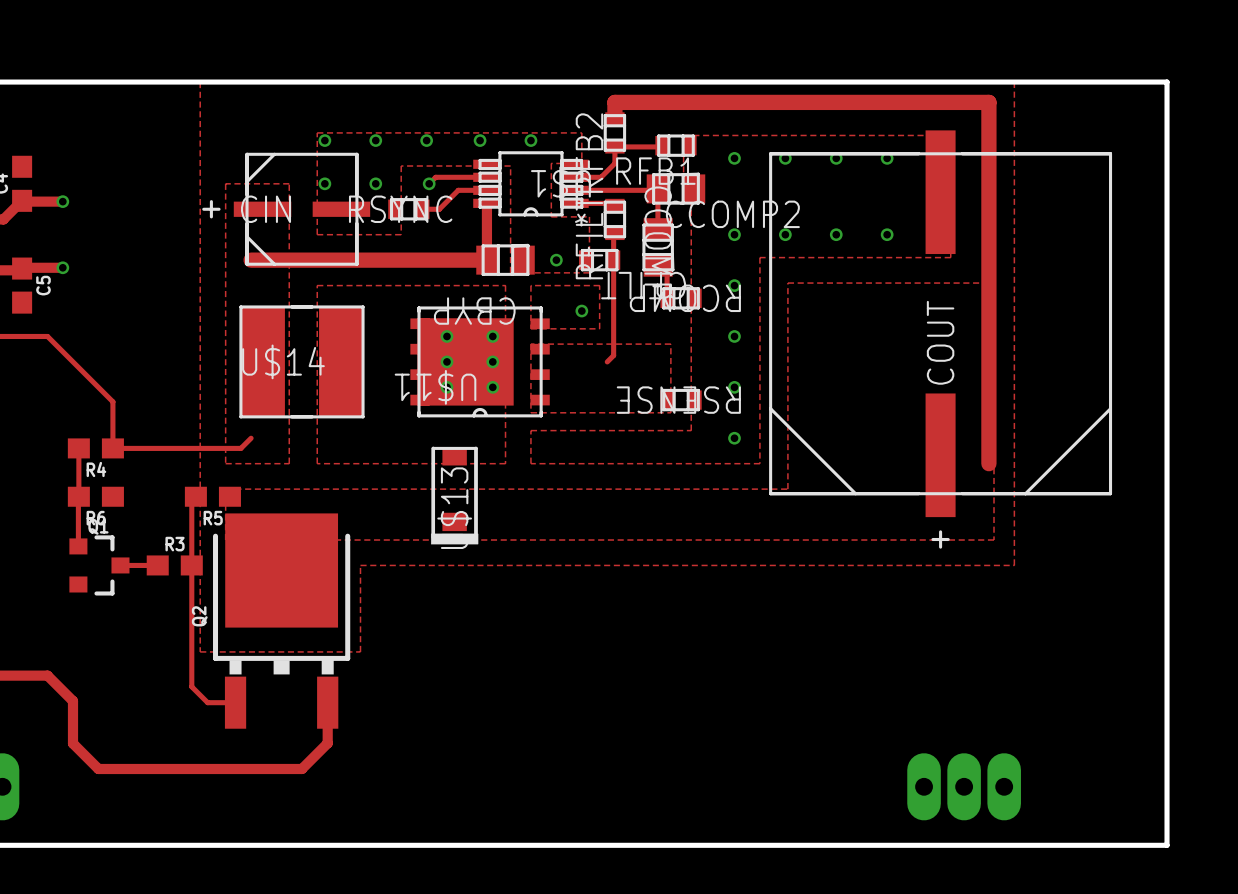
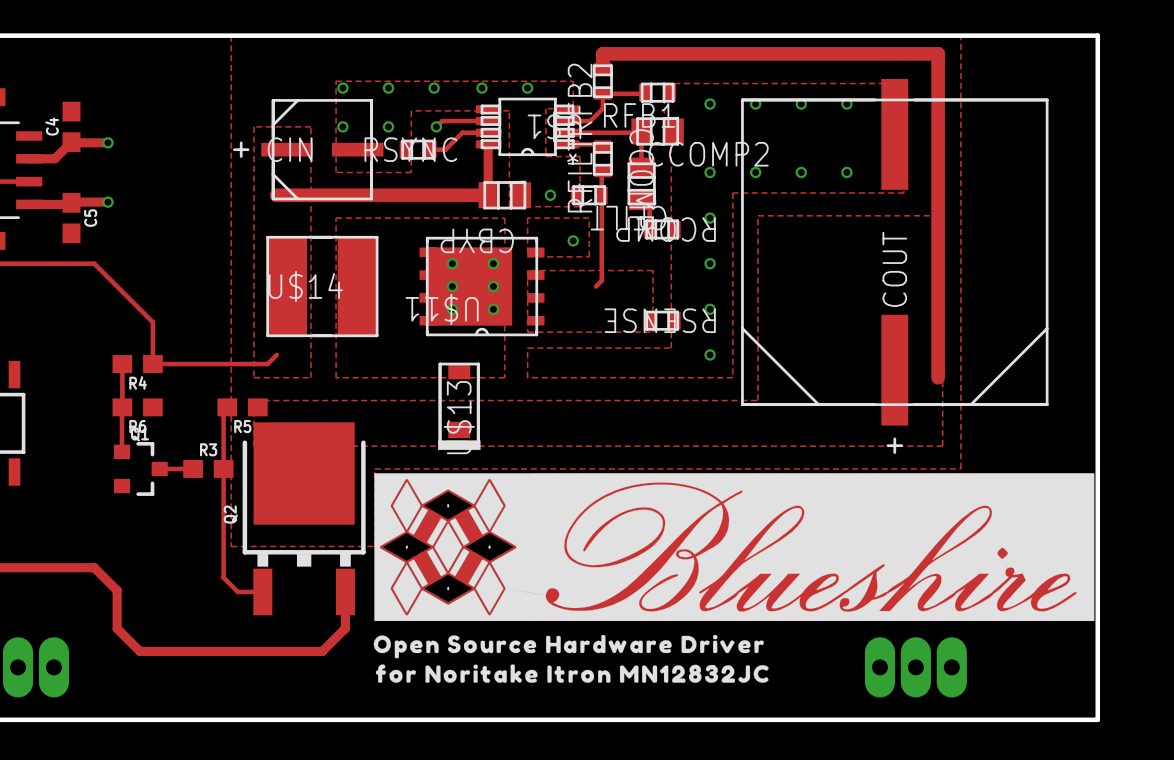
drawing: none -> [373, 473, 1095, 683]

